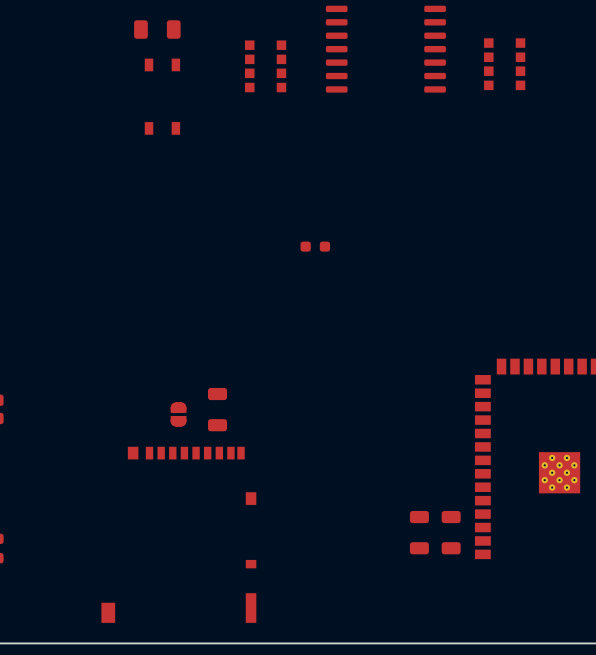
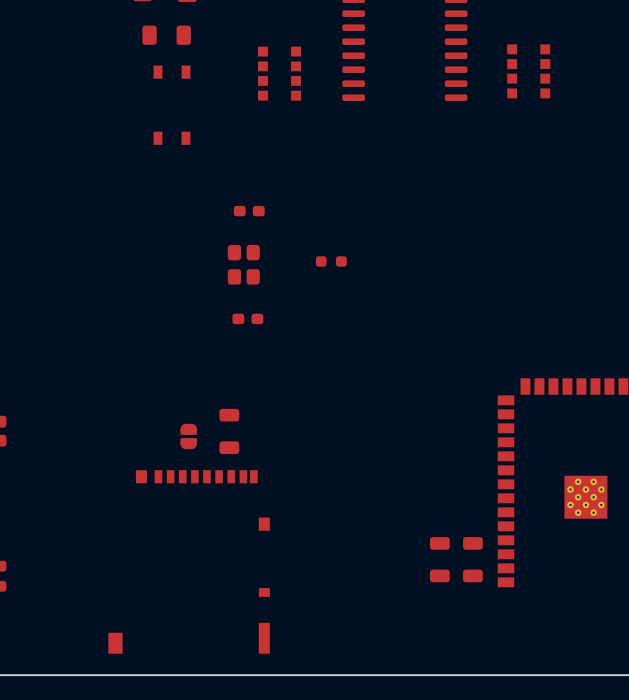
part: none -> (249, 211)
part: none -> (243, 264)
part: none -> (247, 318)

